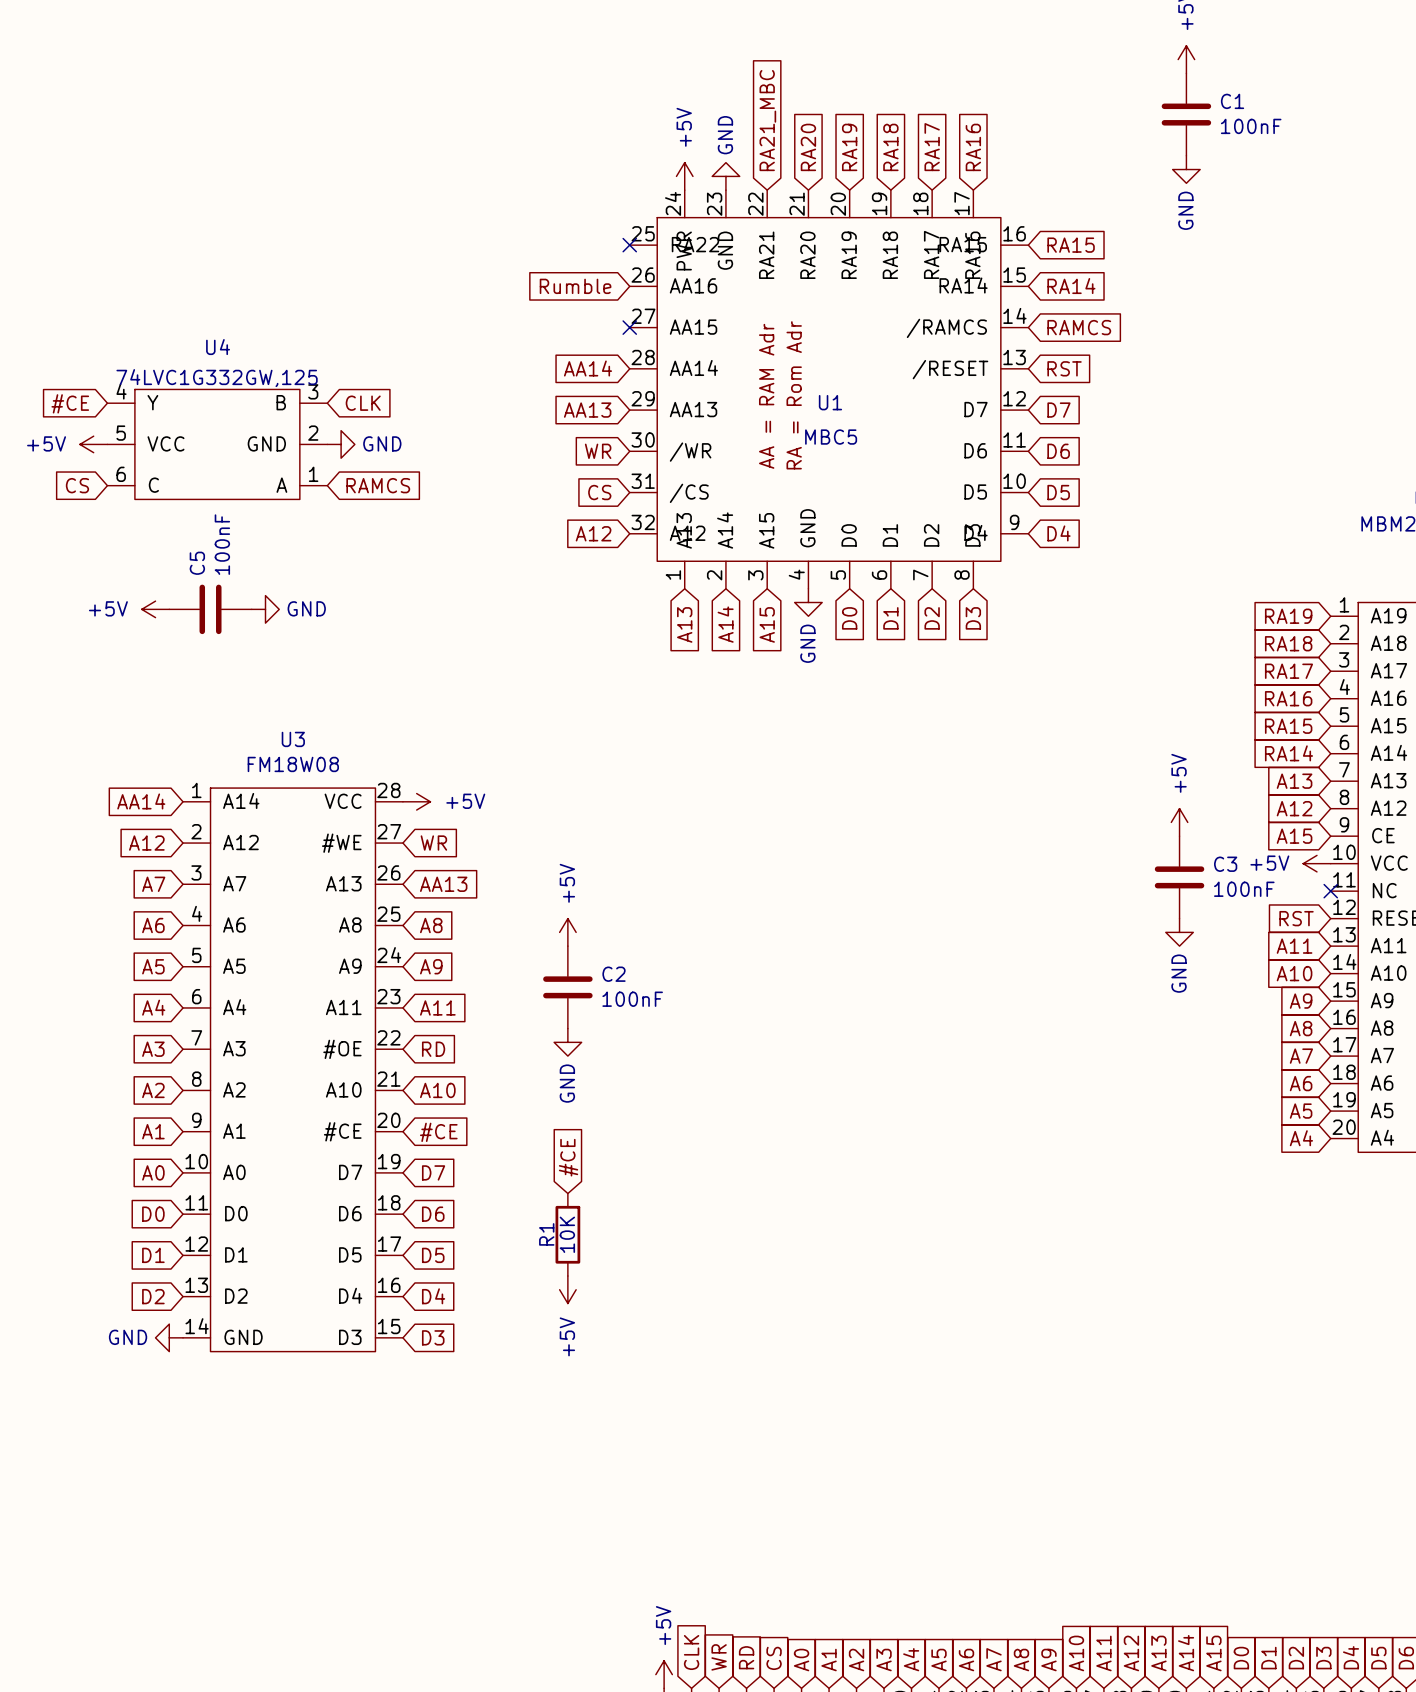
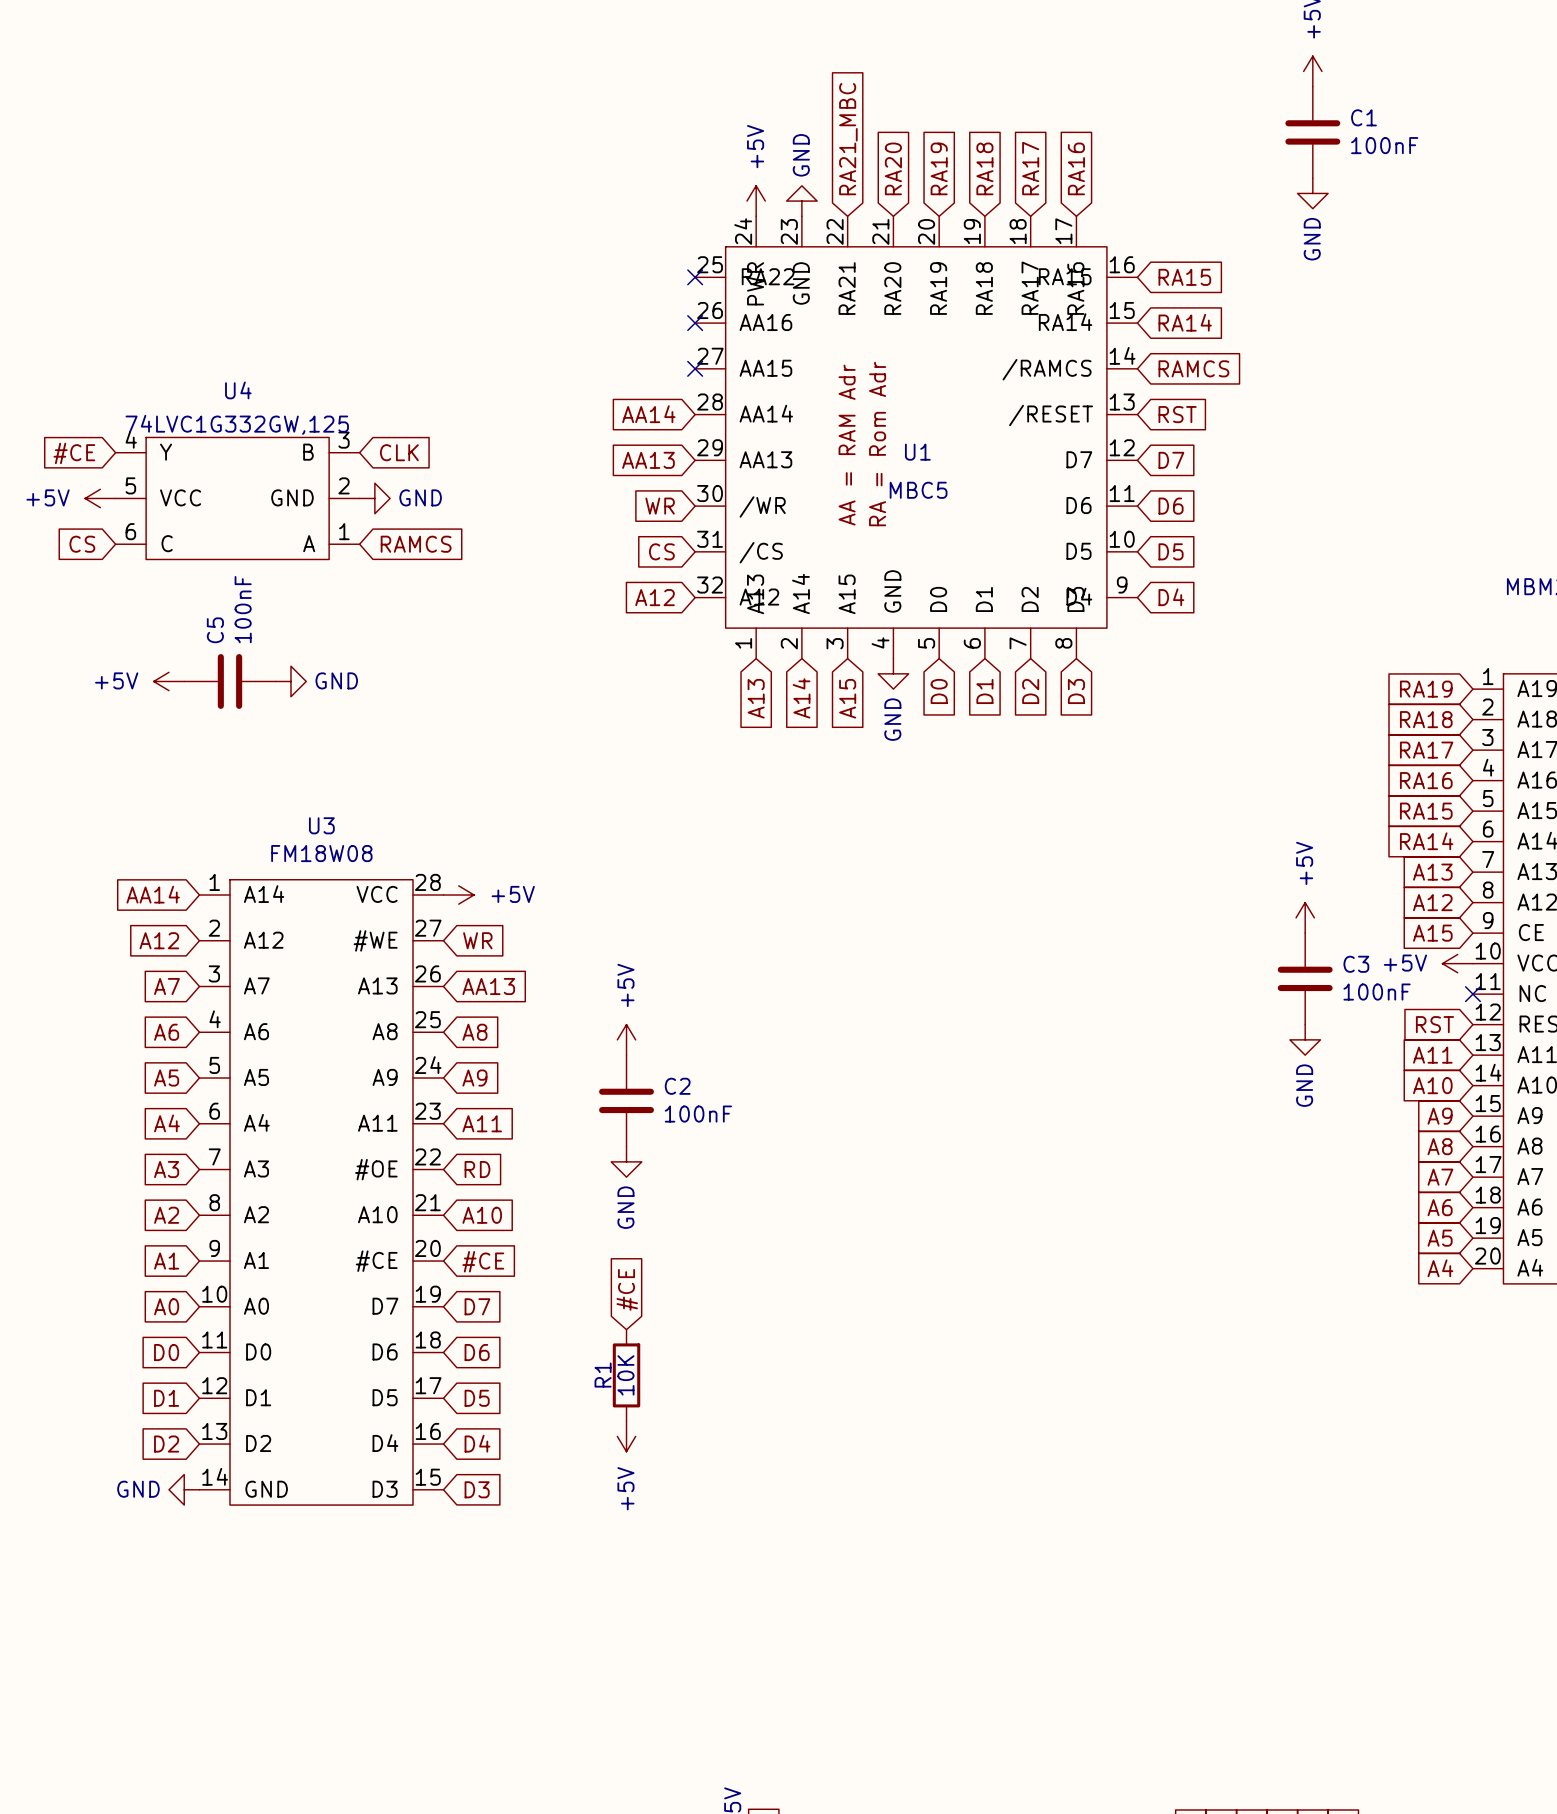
global label: Rumble (575, 286) -> none
no-connect mark: none -> (695, 323)

